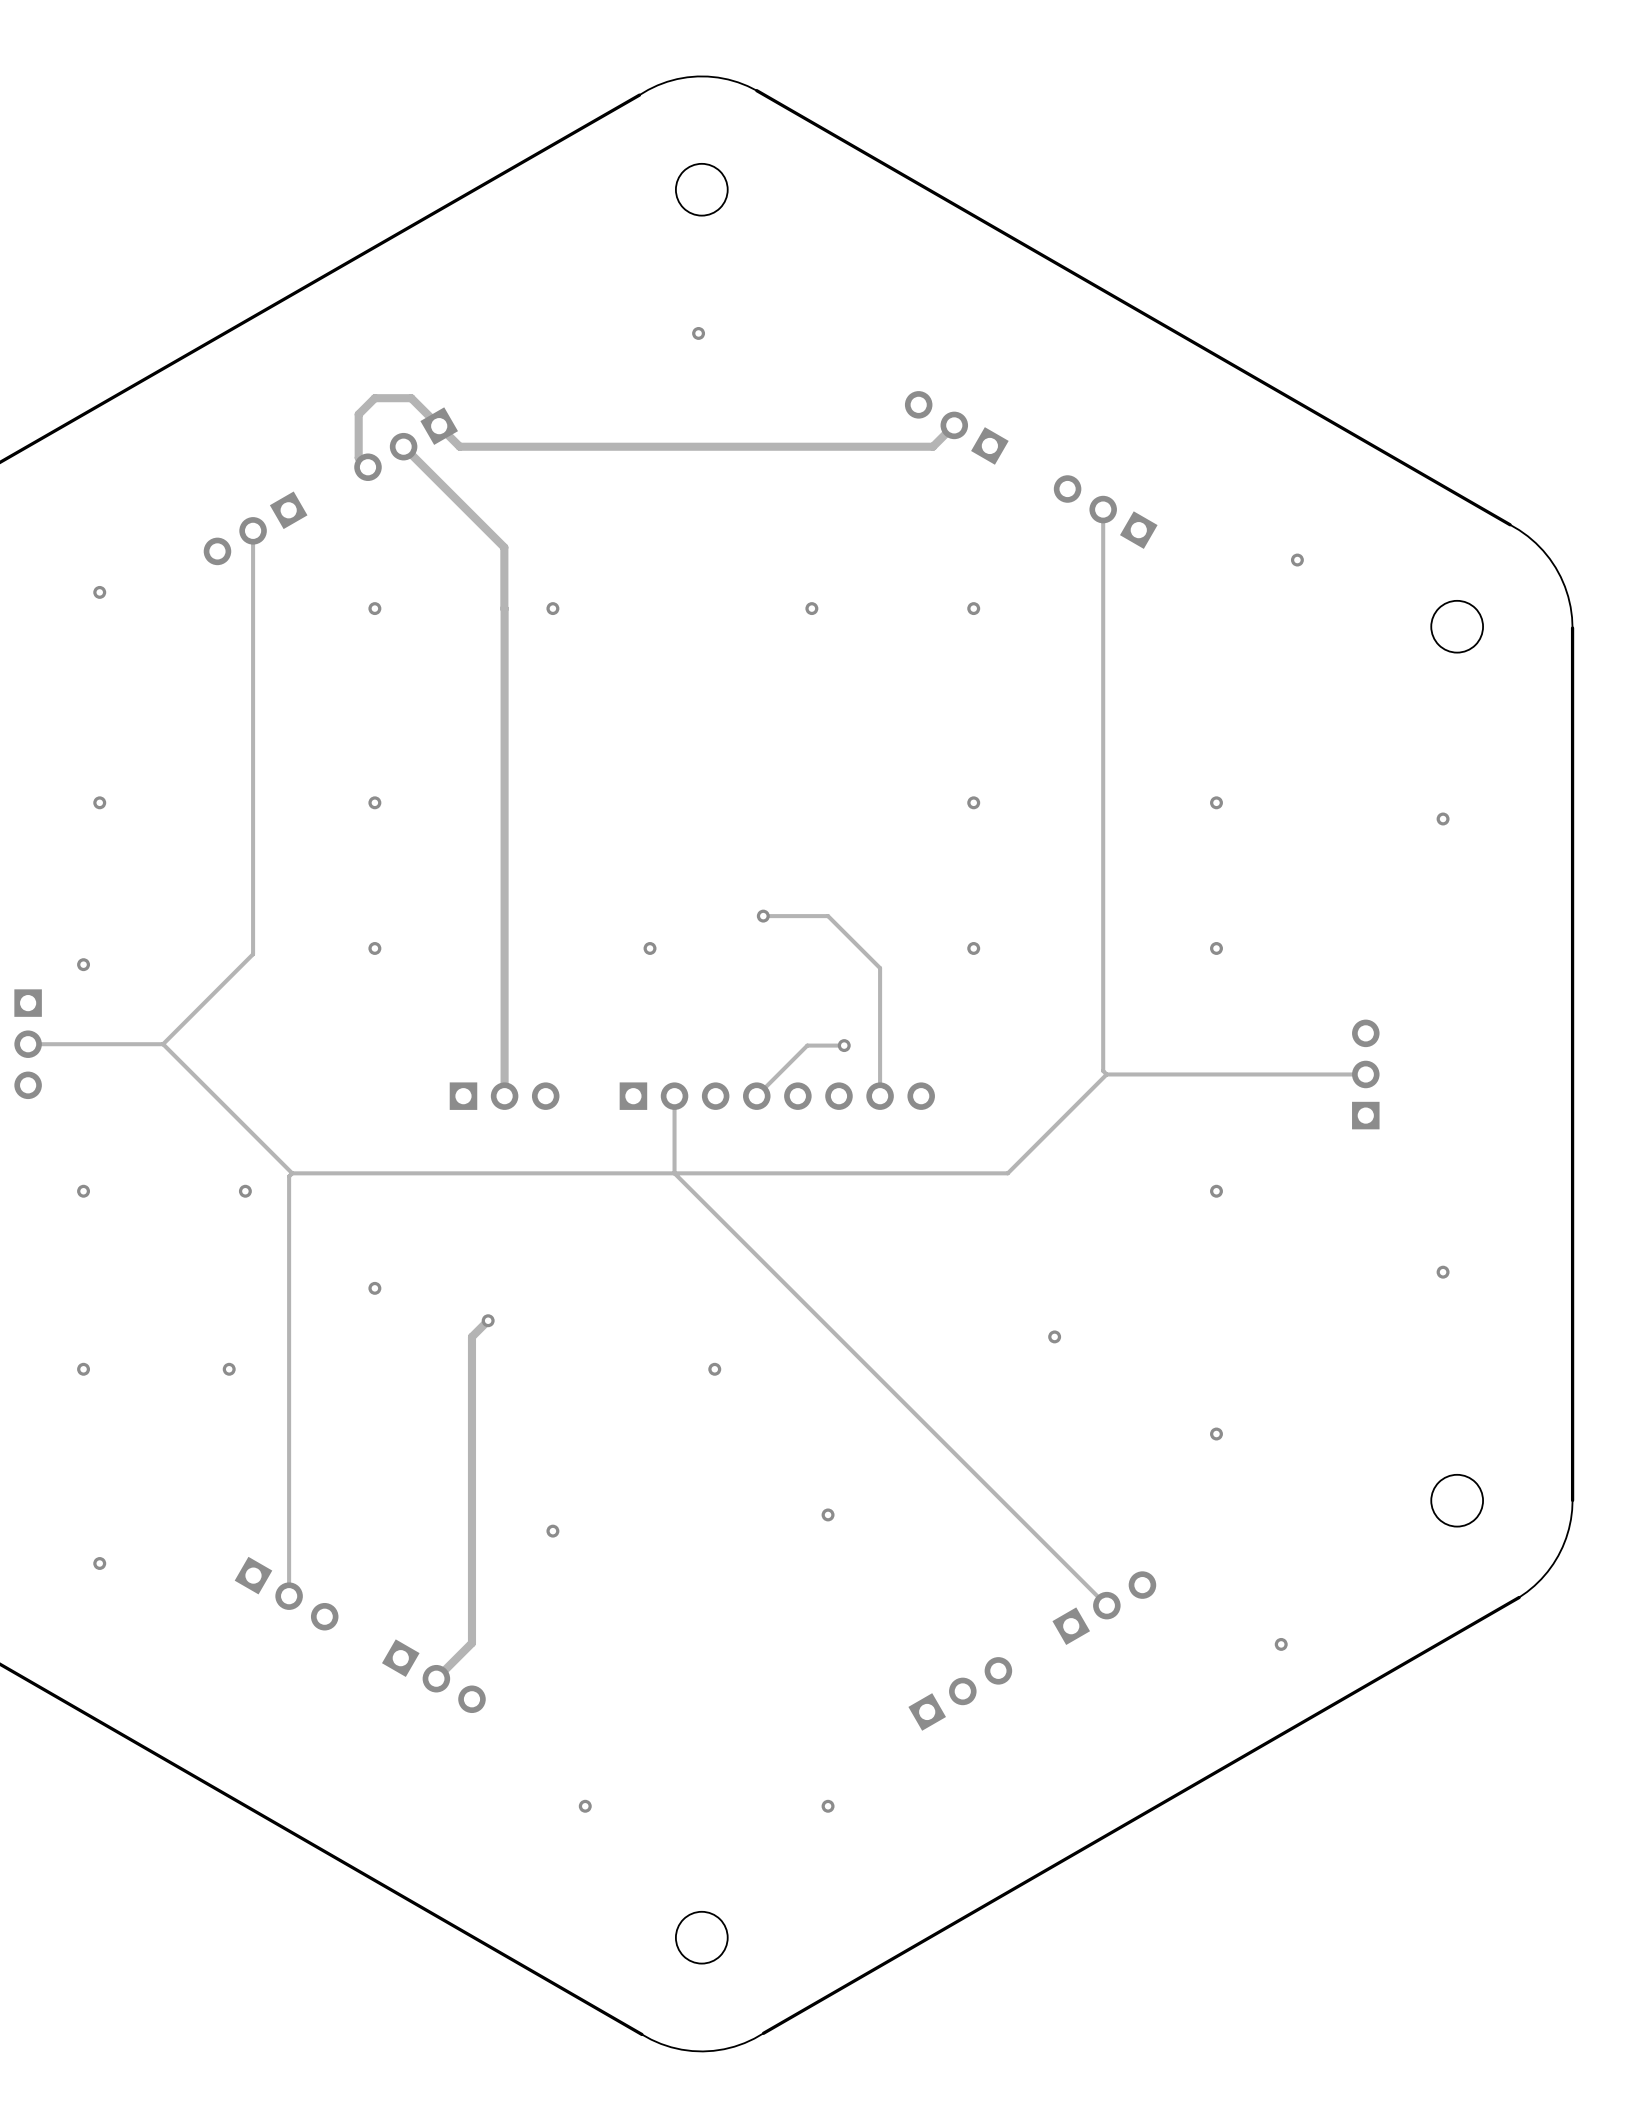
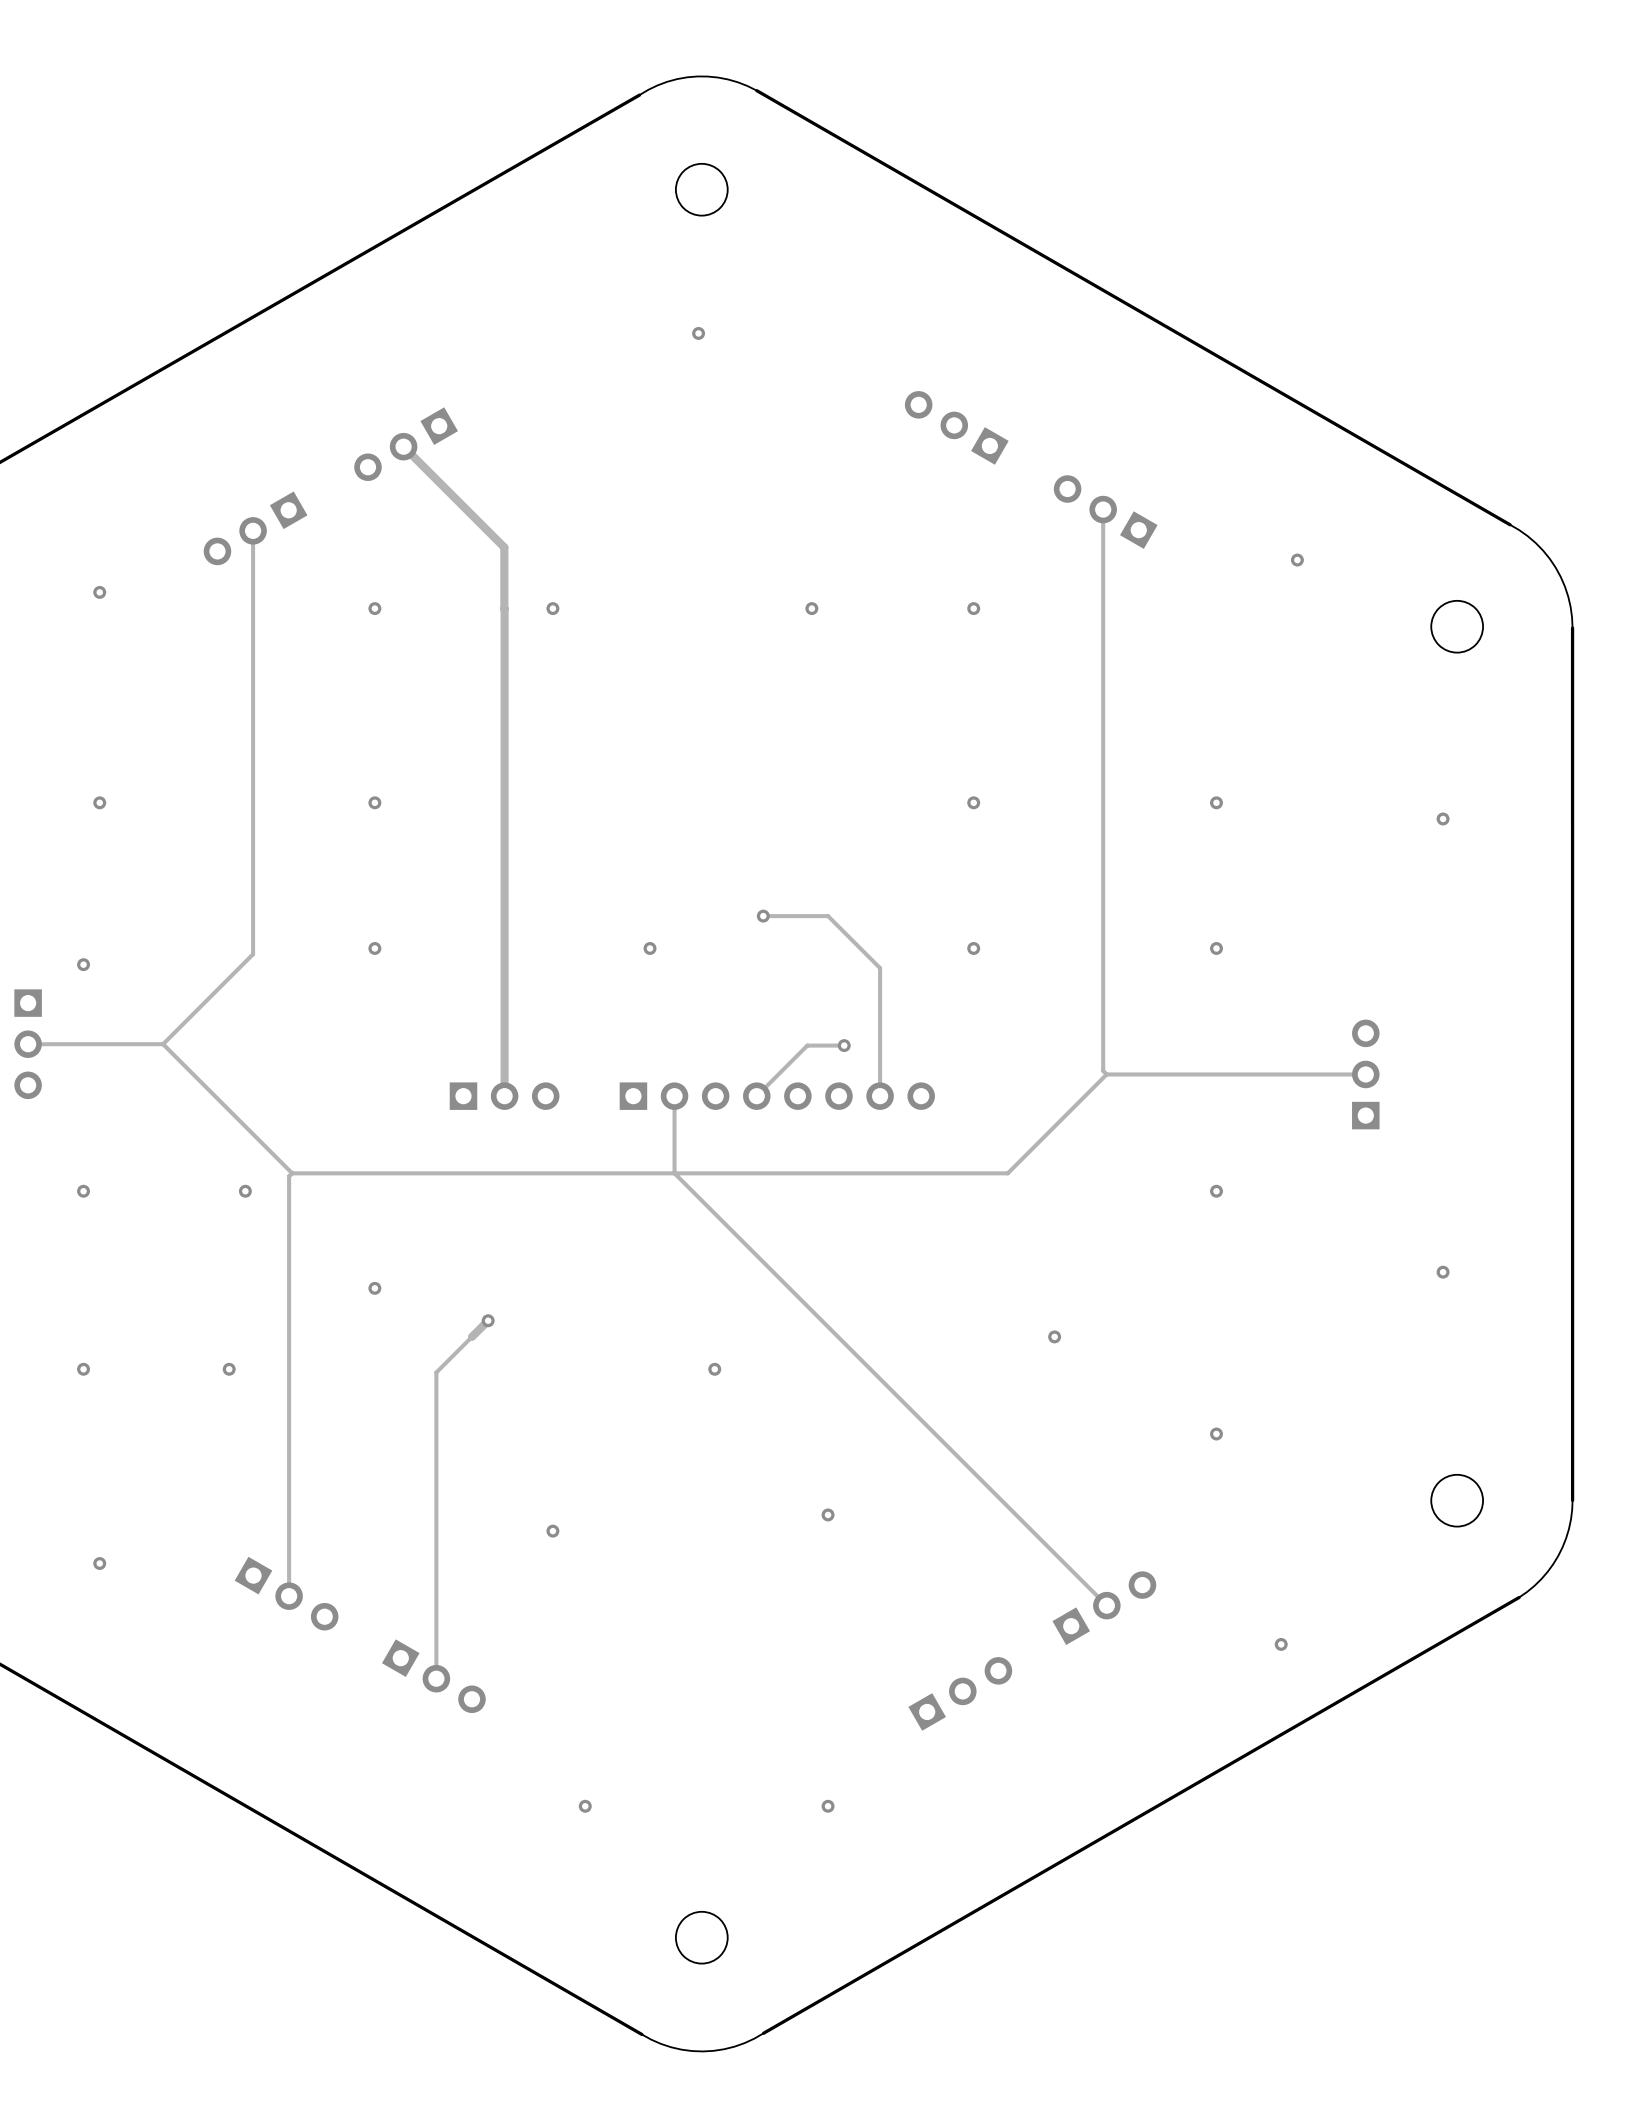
track: (954, 425) (932, 446) (459, 446) (411, 398) (374, 398) (358, 414) (358, 457) (367, 467) -> none
track: (471, 1336) (471, 1643) (436, 1678) -> (471, 1336) (436, 1372) (436, 1678)

